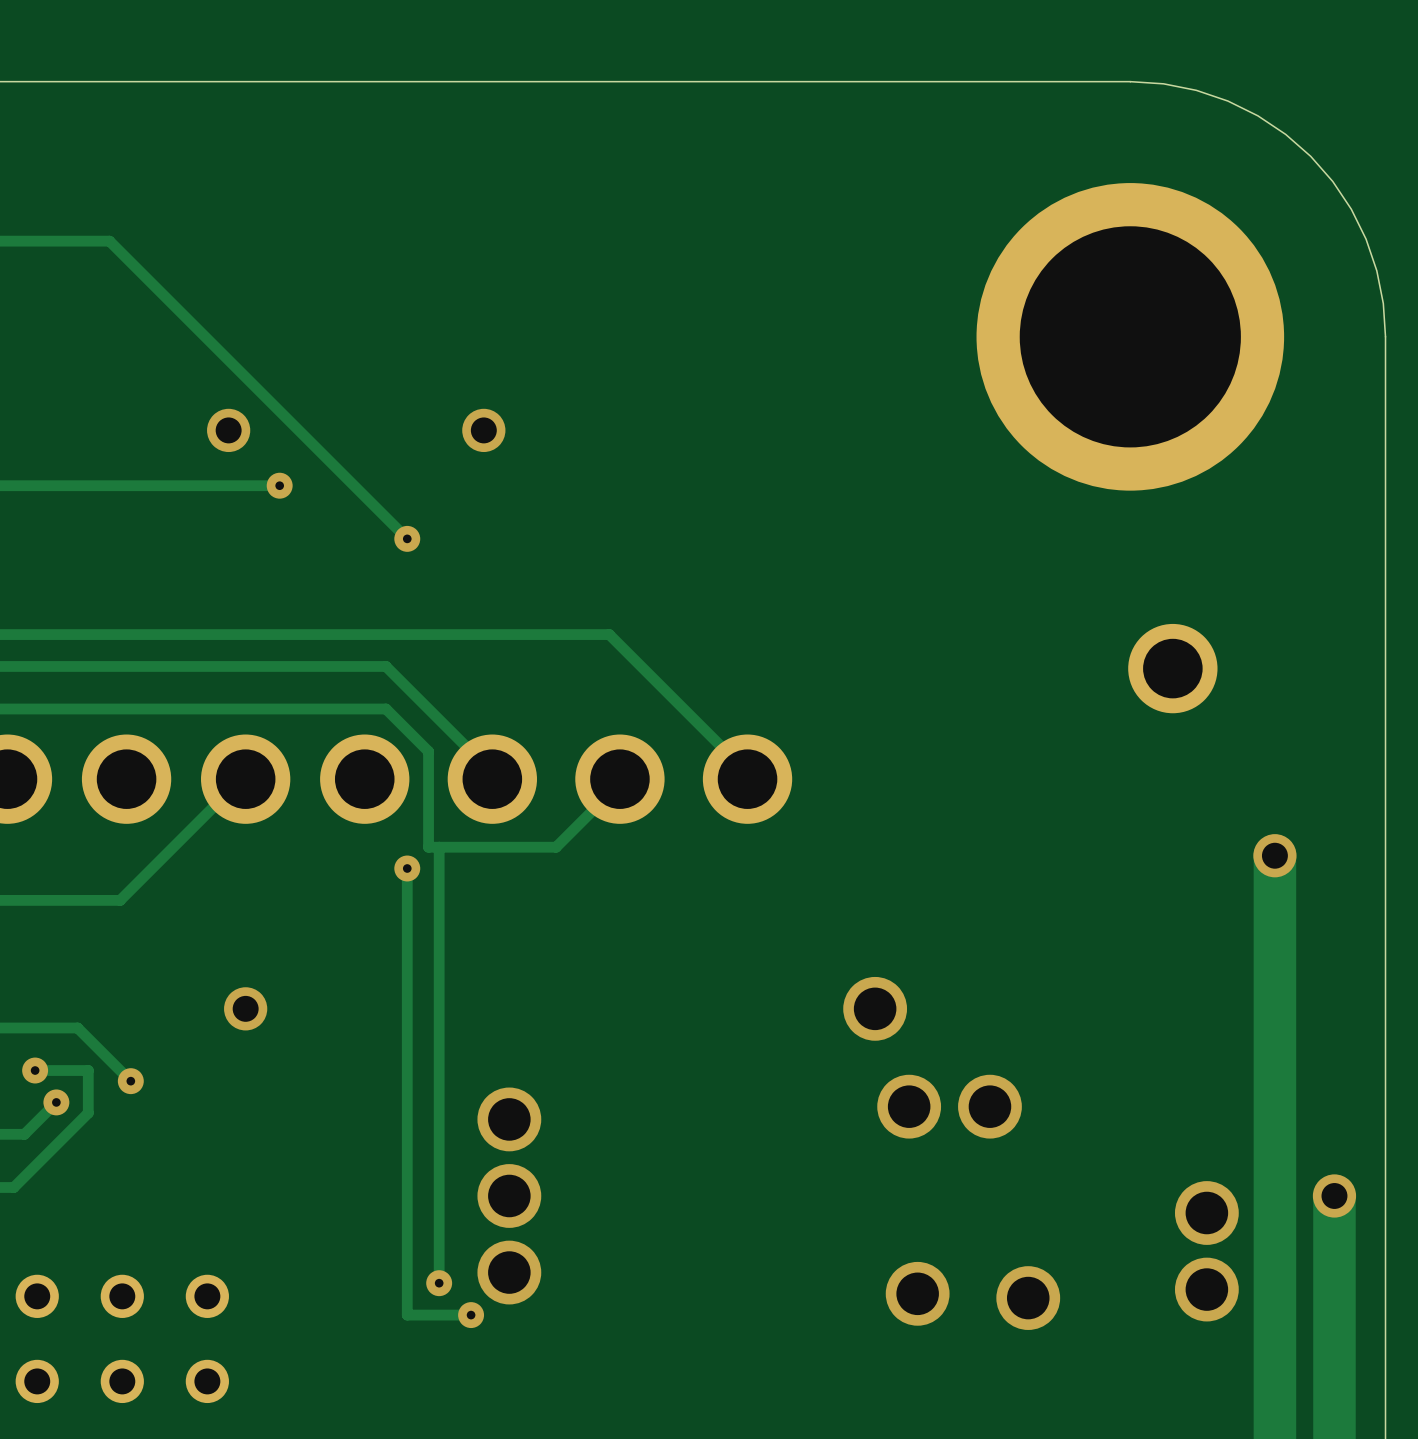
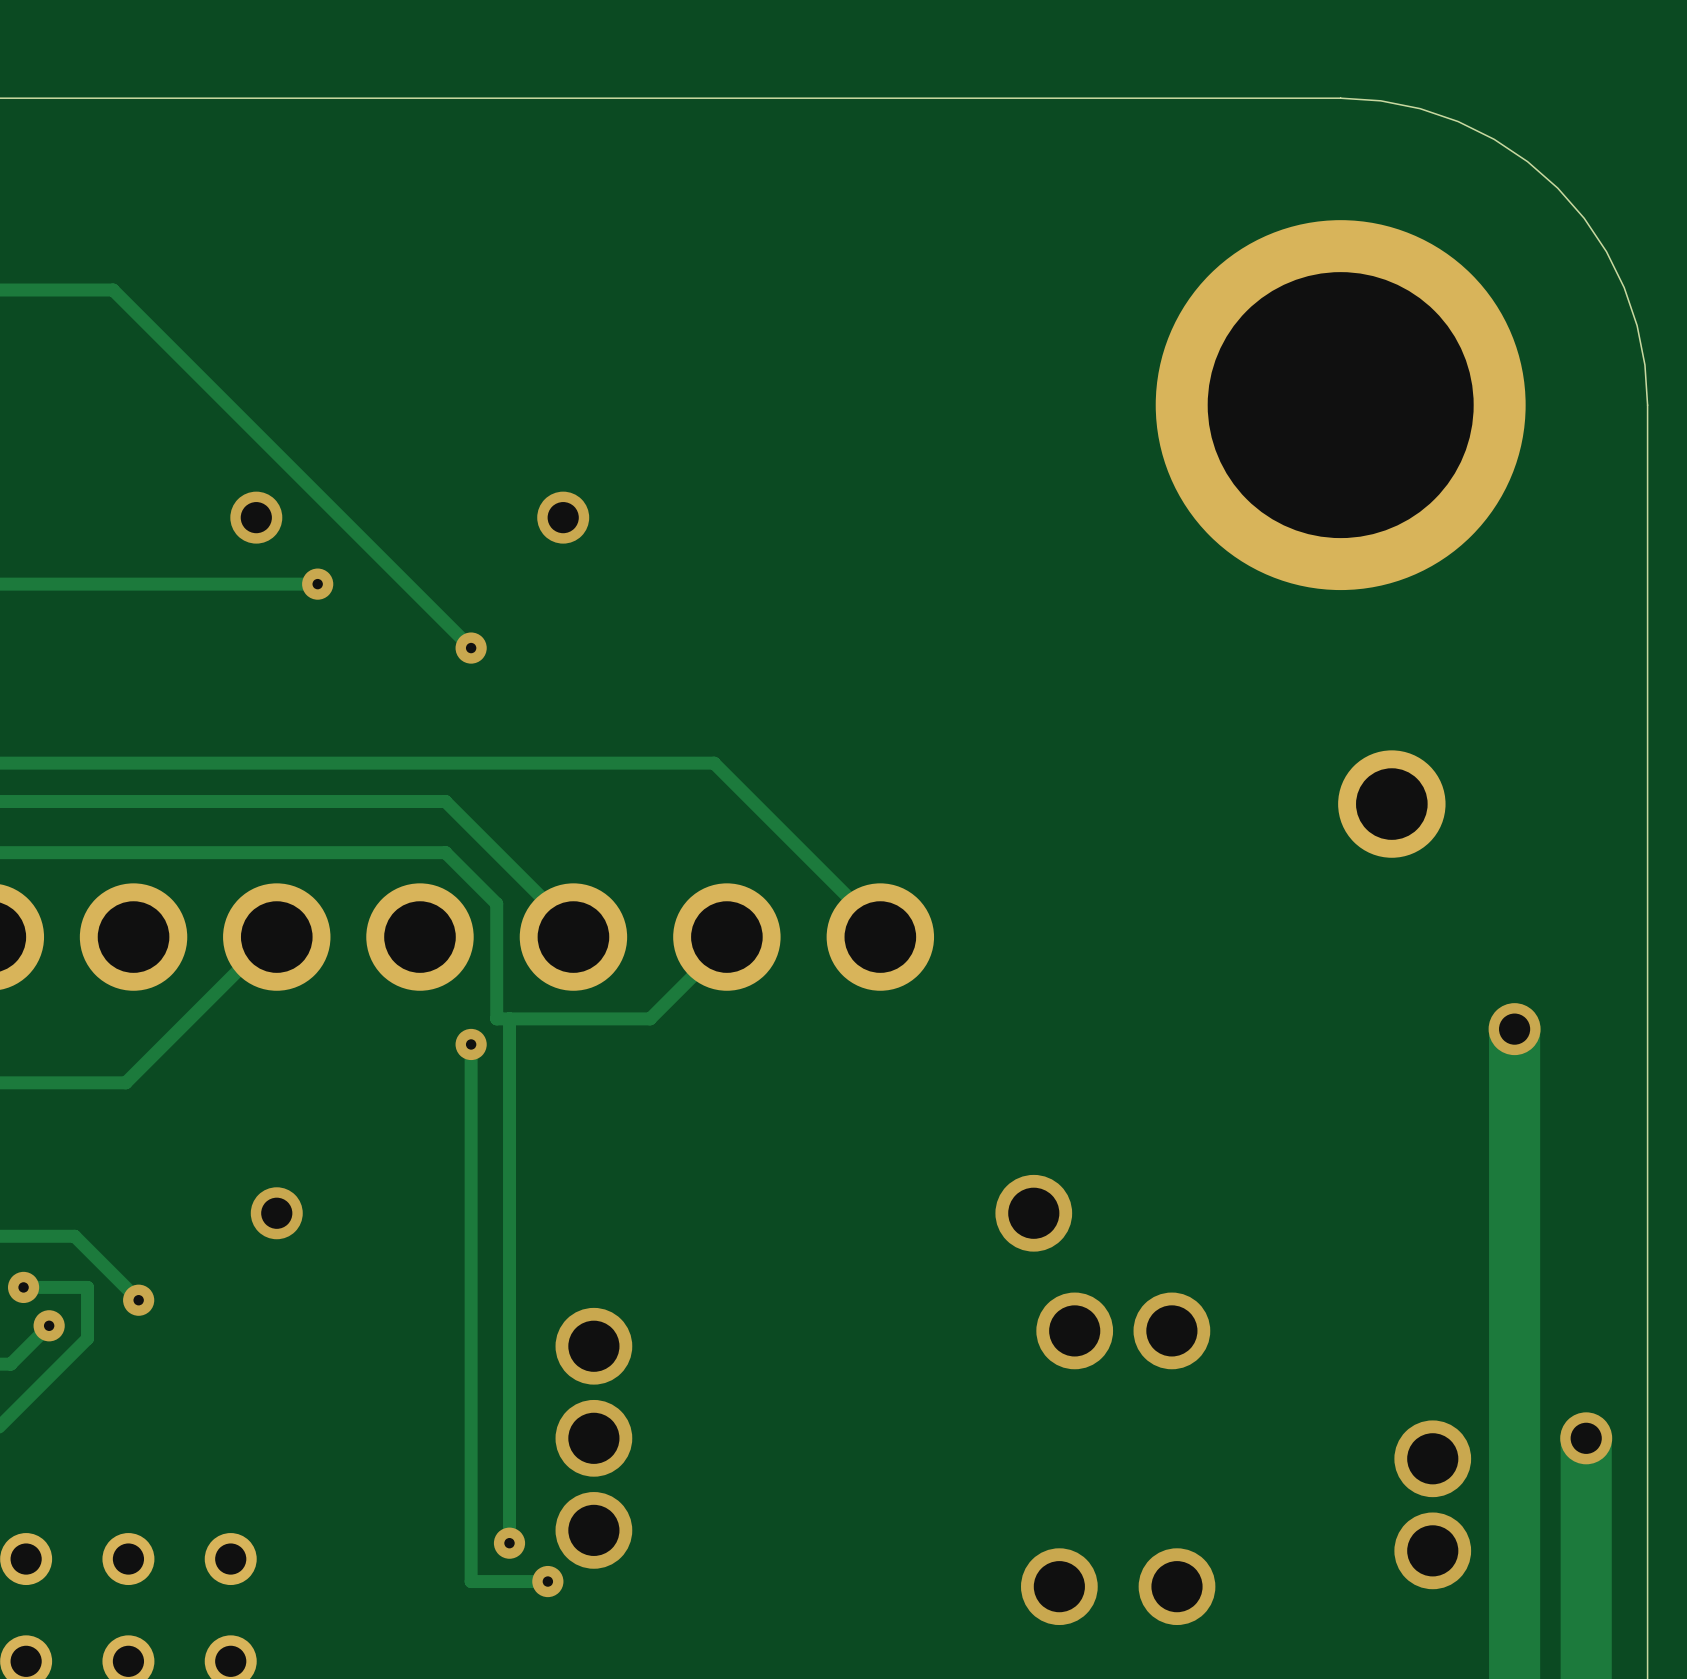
via position: (917, 1293) -> (1059, 1586)
via position: (1028, 1298) -> (1177, 1586)

